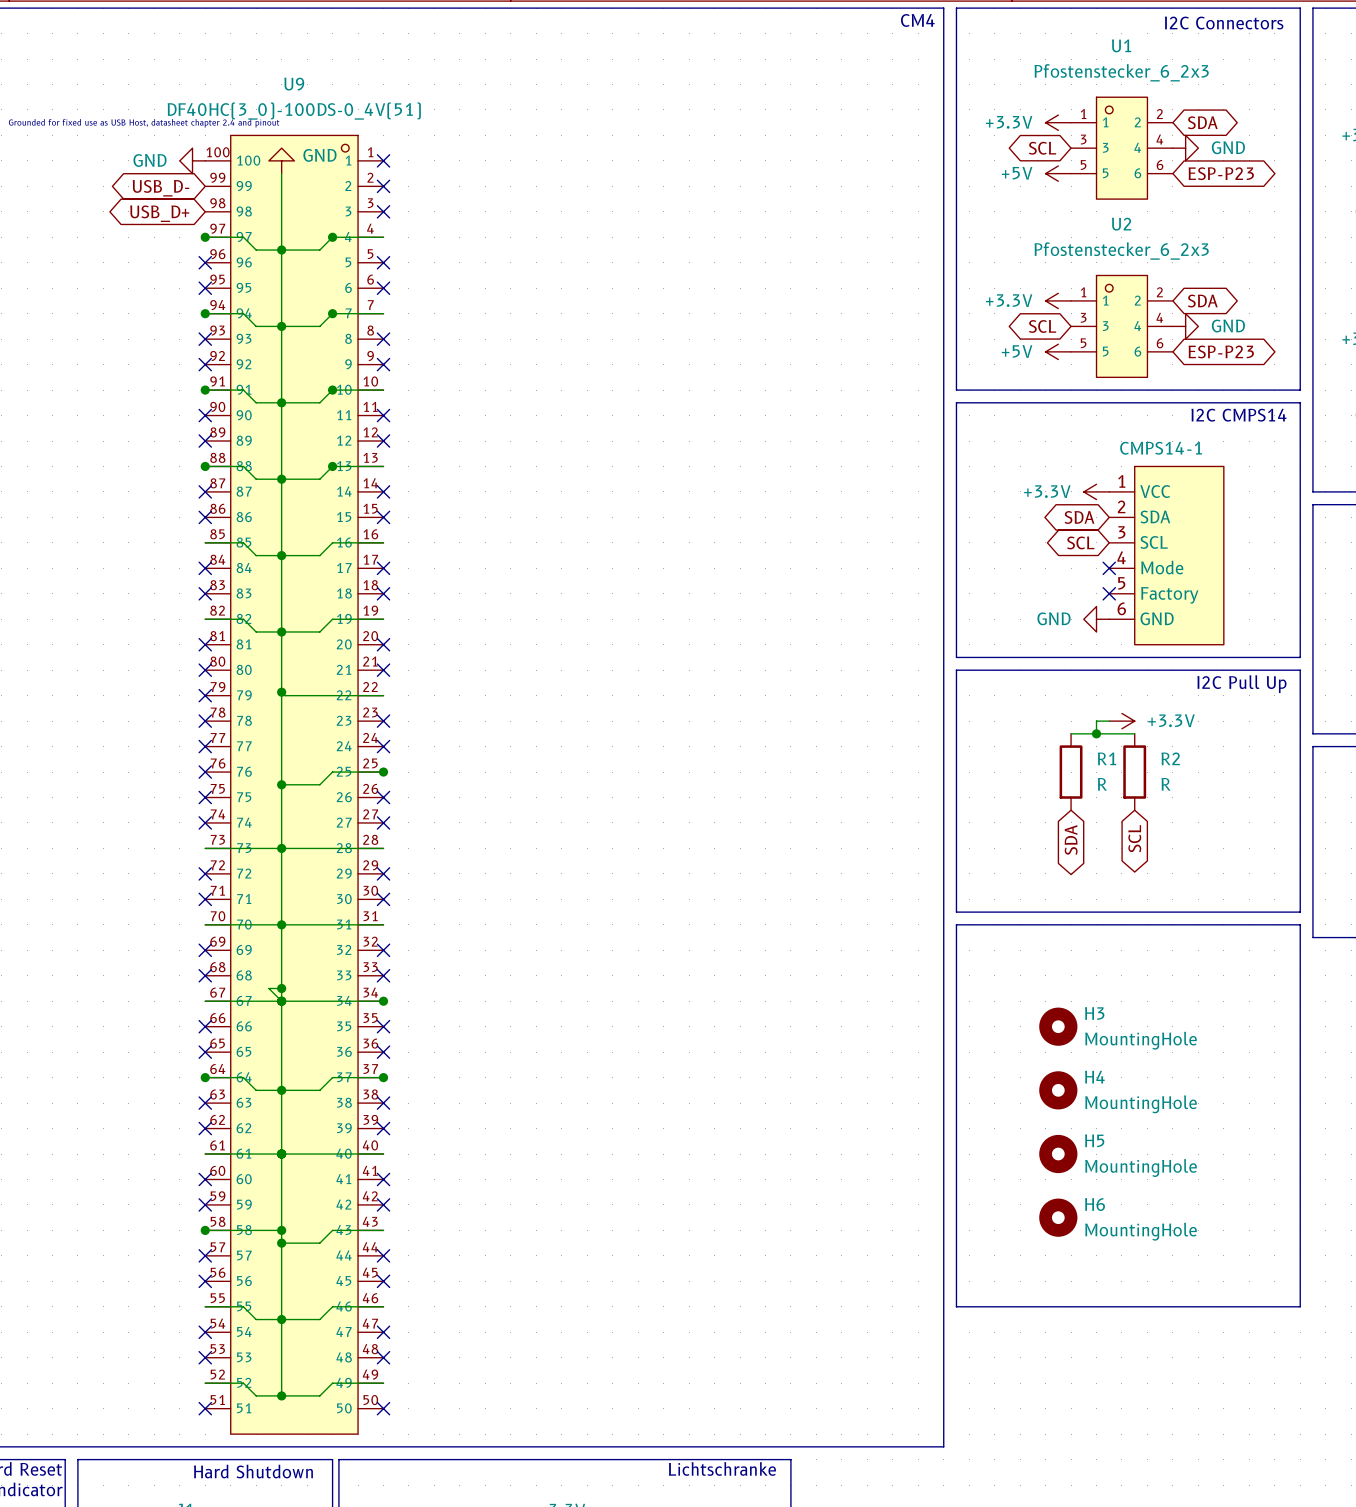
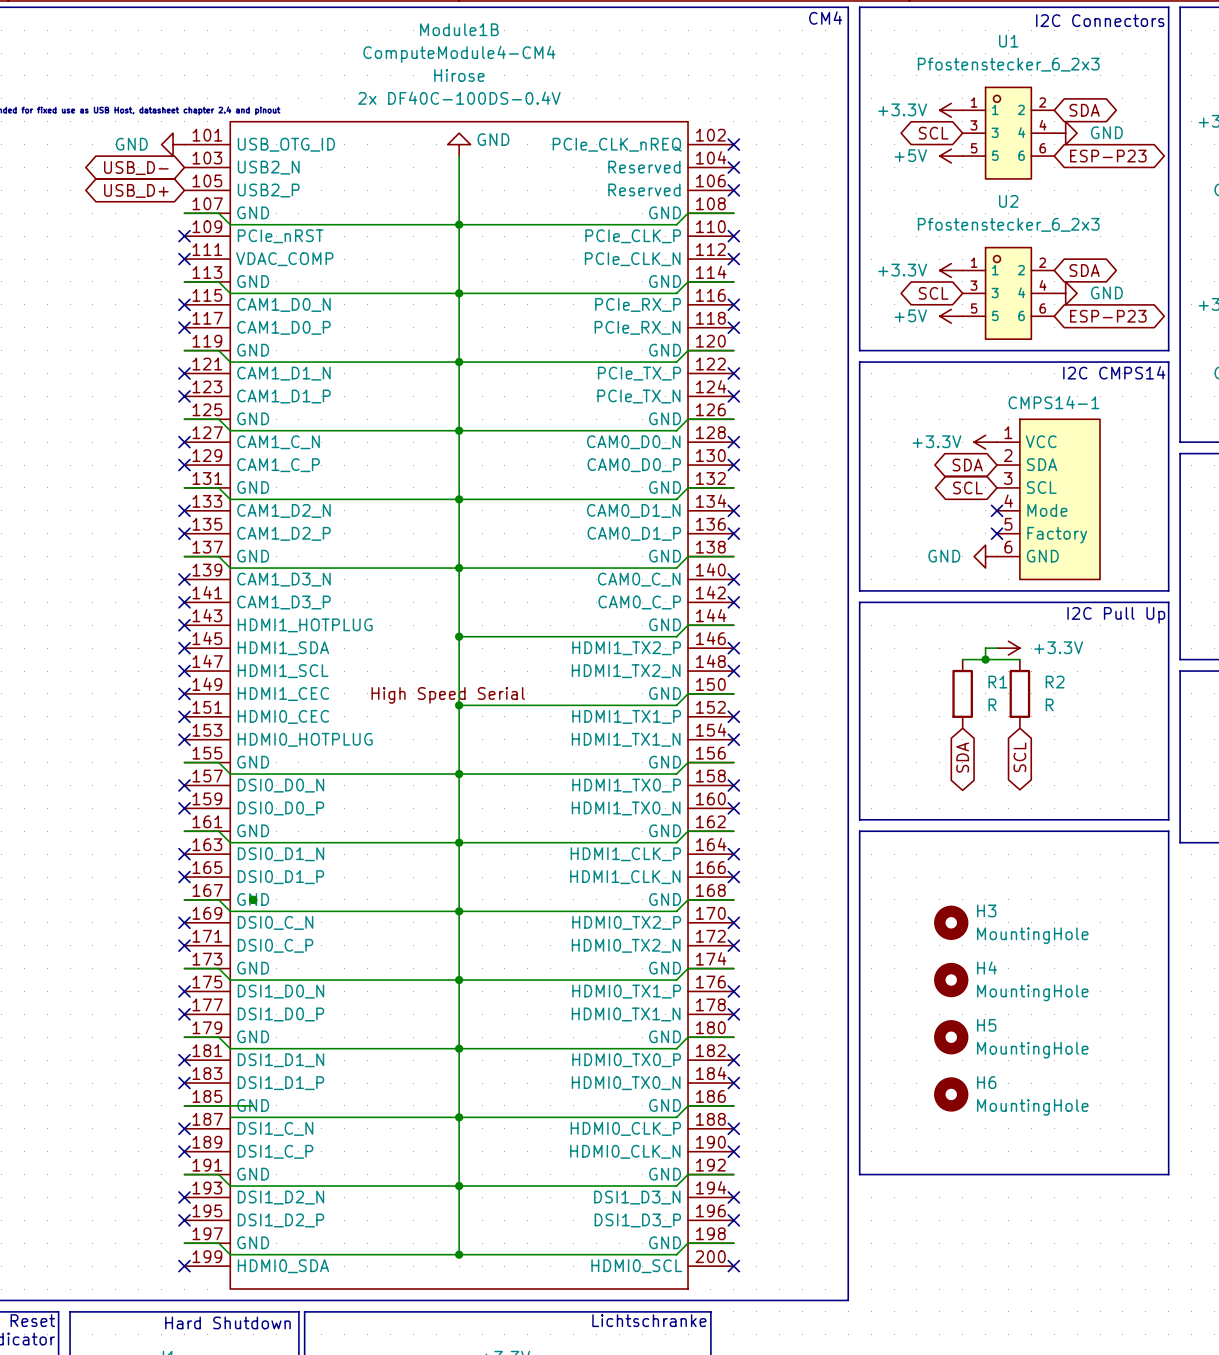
power symbol position: GND (281, 160) -> GND (459, 144)
no-connect mark: (383, 160) -> none
no-connect mark: none -> (733, 144)
wire: (281, 173) (281, 1395) -> (459, 156) (459, 1254)
no-connect mark: (383, 186) -> none
no-connect mark: none -> (733, 167)
no-connect mark: (383, 211) -> none
no-connect mark: none -> (733, 190)
junction: (205, 237) -> none
junction: (332, 237) -> none
wire: (383, 237) (332, 237) (319, 250) -> (733, 213) (688, 213) (676, 224) (287, 224)
junction: (281, 250) -> none
junction: none -> (459, 224)
no-connect mark: (383, 262) -> none
no-connect mark: none -> (733, 236)
no-connect mark: (383, 288) -> none
no-connect mark: none -> (733, 259)
junction: (205, 313) -> none
junction: (332, 313) -> none
wire: (383, 313) (332, 313) (319, 326) -> (733, 281) (688, 281) (676, 293) (287, 293)
junction: (281, 326) -> none
junction: none -> (459, 293)
no-connect mark: (383, 339) -> none
no-connect mark: none -> (733, 304)
no-connect mark: (383, 364) -> none
no-connect mark: none -> (733, 327)
junction: (205, 390) -> none
junction: (332, 390) -> none
wire: (383, 390) (332, 390) (319, 402) -> (733, 350) (688, 350) (676, 362) (287, 362)
junction: (281, 402) -> none
junction: none -> (459, 362)
no-connect mark: (383, 415) -> none
no-connect mark: none -> (733, 373)
no-connect mark: (383, 441) -> none
no-connect mark: none -> (733, 396)
junction: (205, 466) -> none
junction: (332, 466) -> none
wire: (383, 466) (332, 466) (319, 479) -> (733, 419) (688, 419) (676, 430) (287, 430)
junction: (281, 479) -> none
junction: none -> (459, 430)
no-connect mark: (383, 491) -> none
no-connect mark: none -> (733, 442)
no-connect mark: (383, 517) -> none
no-connect mark: none -> (733, 465)
wire: (383, 542) (332, 542) (319, 555) -> (733, 487) (688, 487) (676, 499) (287, 499)
junction: (281, 555) -> none
junction: none -> (459, 499)
no-connect mark: (383, 568) -> none
no-connect mark: none -> (733, 510)
no-connect mark: (383, 593) -> none
no-connect mark: none -> (733, 533)
wire: (383, 619) (332, 619) (319, 631) -> (733, 556) (688, 556) (676, 568) (287, 568)
junction: (281, 631) -> none
junction: none -> (459, 568)
no-connect mark: (383, 644) -> none
no-connect mark: none -> (733, 579)
no-connect mark: (383, 670) -> none
no-connect mark: none -> (733, 602)
wire: (281, 692) (285, 695) (383, 695) -> none
junction: (281, 692) -> none
wire: none -> (733, 625) (688, 625) (676, 636) (459, 636)
junction: none -> (459, 636)
no-connect mark: (383, 721) -> none
no-connect mark: none -> (733, 648)
no-connect mark: (383, 746) -> none
no-connect mark: none -> (733, 671)
wire: (383, 772) (332, 772) (319, 784) (281, 784) -> none
junction: (383, 772) -> none
wire: none -> (733, 693) (688, 693) (676, 705) (459, 705)
junction: (281, 784) -> none
U9: DF40HC(3_0)-100DS-0_4V(51) (294, 784) -> none
junction: none -> (459, 705)
Module1B: none -> ComputeModule4-CM4 (459, 705)
no-connect mark: (383, 797) -> none
no-connect mark: none -> (733, 716)
no-connect mark: (383, 822) -> none
no-connect mark: none -> (733, 739)
wire: (243, 848) (383, 848) -> (218, 762) (230, 774) (676, 774) (688, 762) (733, 762)
junction: (281, 848) -> none
junction: none -> (459, 774)
no-connect mark: (383, 873) -> none
no-connect mark: none -> (733, 785)
no-connect mark: (383, 899) -> none
no-connect mark: none -> (733, 808)
wire: (243, 924) (383, 924) -> (218, 831) (230, 842) (676, 842) (688, 831) (733, 831)
junction: (281, 924) -> none
junction: none -> (459, 842)
no-connect mark: (383, 950) -> none
no-connect mark: none -> (733, 854)
no-connect mark: (383, 975) -> none
no-connect mark: none -> (733, 877)
wire: (281, 988) (268, 988) (281, 1001) -> none
junction: (281, 988) -> none
wire: (243, 1001) (383, 1001) -> (218, 899) (230, 911) (676, 911) (688, 899) (733, 899)
junction: (383, 1001) -> none
junction: none -> (459, 911)
no-connect mark: (383, 1026) -> none
no-connect mark: none -> (733, 922)
no-connect mark: (383, 1052) -> none
no-connect mark: none -> (733, 945)
junction: (205, 1077) -> none
wire: (383, 1077) (332, 1077) (319, 1090) -> (733, 968) (688, 968) (676, 980) (287, 980)
junction: (383, 1077) -> none
junction: (281, 1090) -> none
junction: none -> (459, 980)
no-connect mark: (383, 1103) -> none
no-connect mark: none -> (733, 991)
no-connect mark: (383, 1128) -> none
no-connect mark: none -> (733, 1014)
wire: (243, 1154) (383, 1154) -> (218, 1037) (230, 1048) (676, 1048) (688, 1037) (733, 1037)
junction: none -> (459, 1048)
no-connect mark: (383, 1179) -> none
no-connect mark: none -> (733, 1060)
no-connect mark: (383, 1204) -> none
no-connect mark: none -> (733, 1083)
junction: (205, 1230) -> none
junction: (281, 1230) -> none
wire: (383, 1230) (332, 1230) (319, 1243) -> (733, 1105) (688, 1105) (676, 1117) (287, 1117)
junction: (281, 1243) -> none
junction: none -> (459, 1117)
no-connect mark: (383, 1255) -> none
no-connect mark: none -> (733, 1128)
no-connect mark: (383, 1281) -> none
no-connect mark: none -> (733, 1151)
wire: (383, 1306) (332, 1306) (319, 1319) -> (733, 1174) (688, 1174) (676, 1186) (287, 1186)
junction: (281, 1319) -> none
junction: none -> (459, 1186)
no-connect mark: (383, 1332) -> none
no-connect mark: none -> (733, 1197)
no-connect mark: (383, 1357) -> none
no-connect mark: none -> (733, 1220)
wire: (383, 1383) (332, 1383) (319, 1395) -> (733, 1243) (688, 1243) (676, 1254) (287, 1254)
junction: (281, 1395) -> none
junction: none -> (459, 1254)
no-connect mark: (383, 1408) -> none
no-connect mark: none -> (733, 1266)

